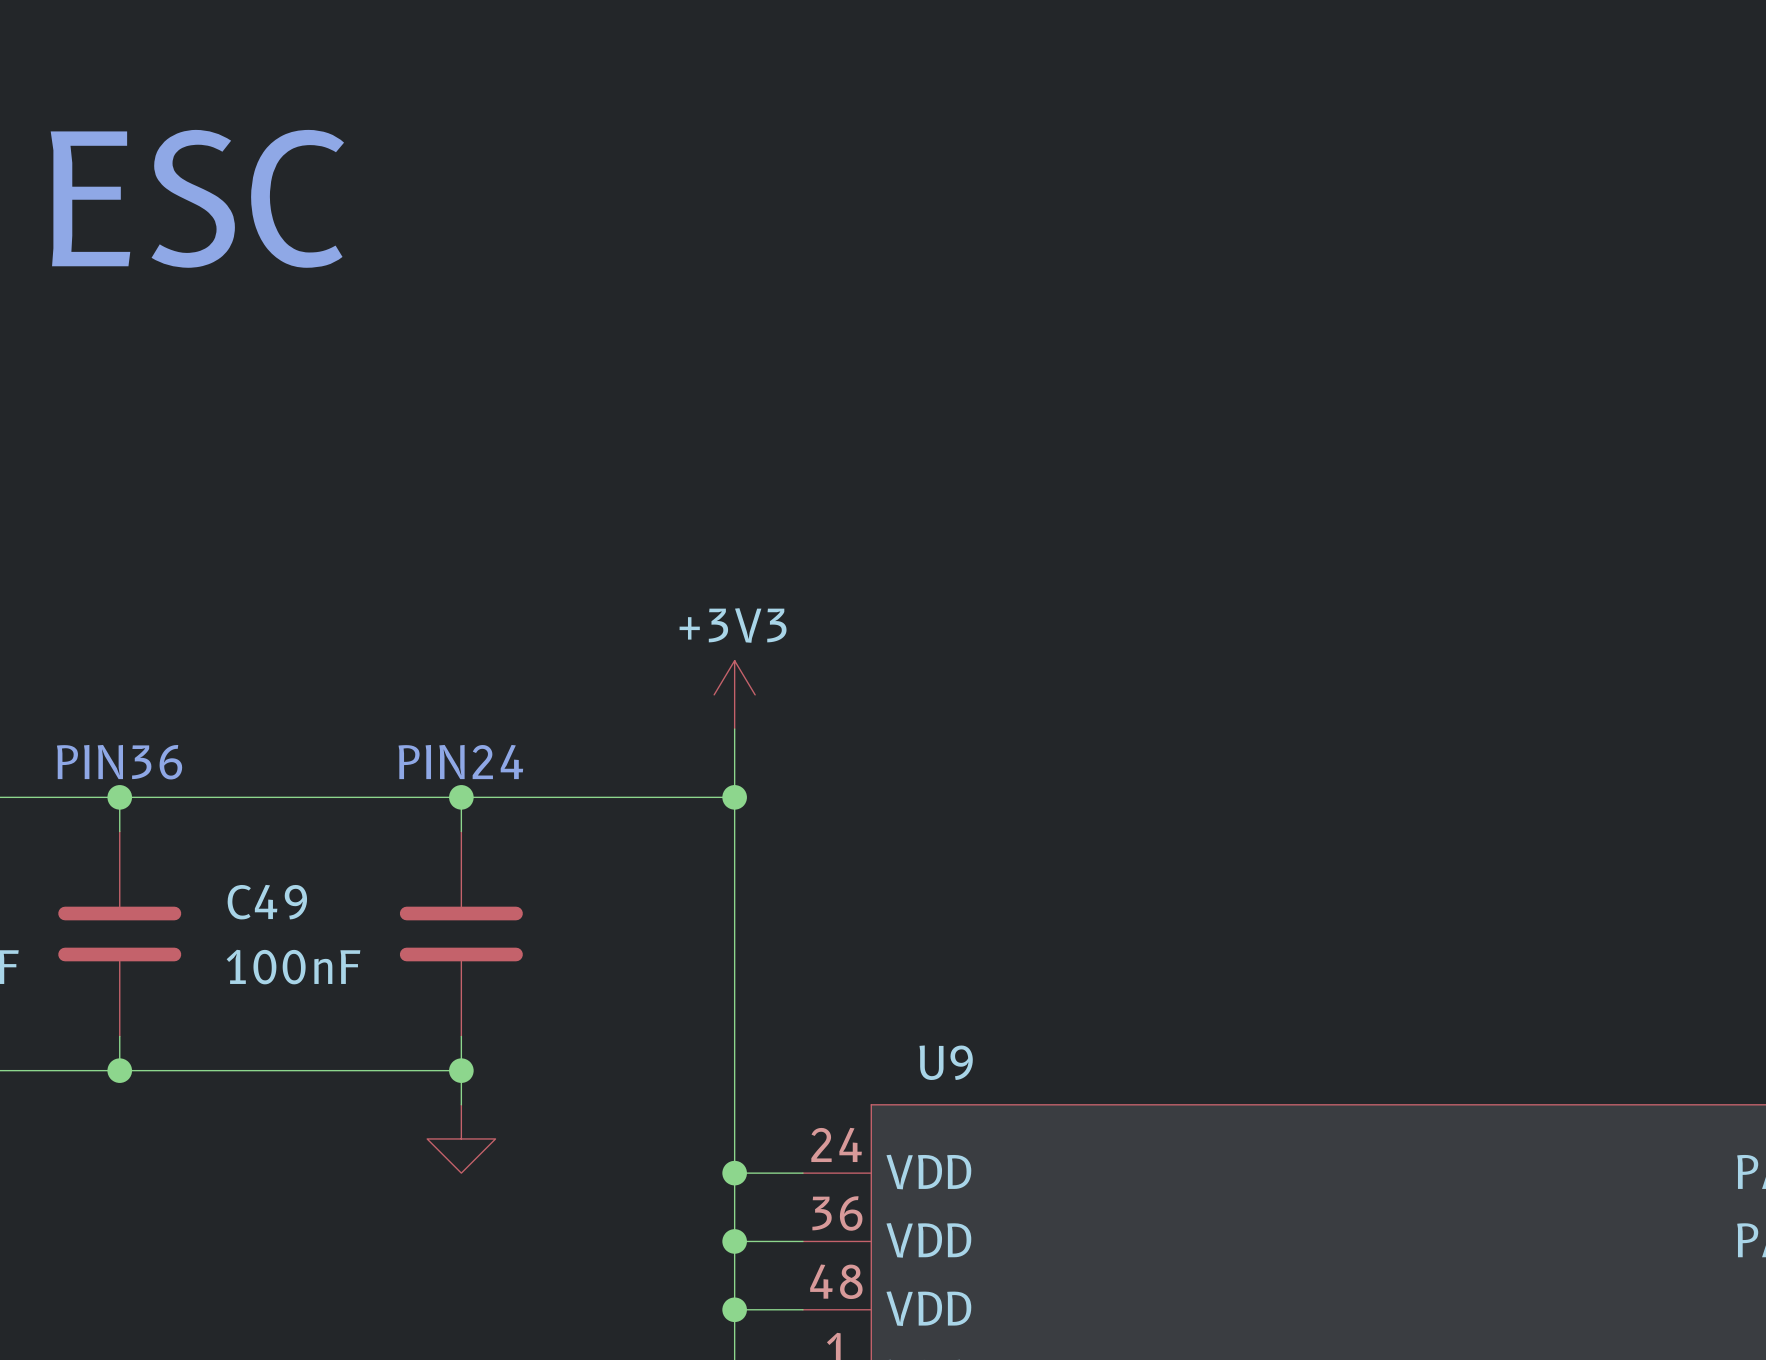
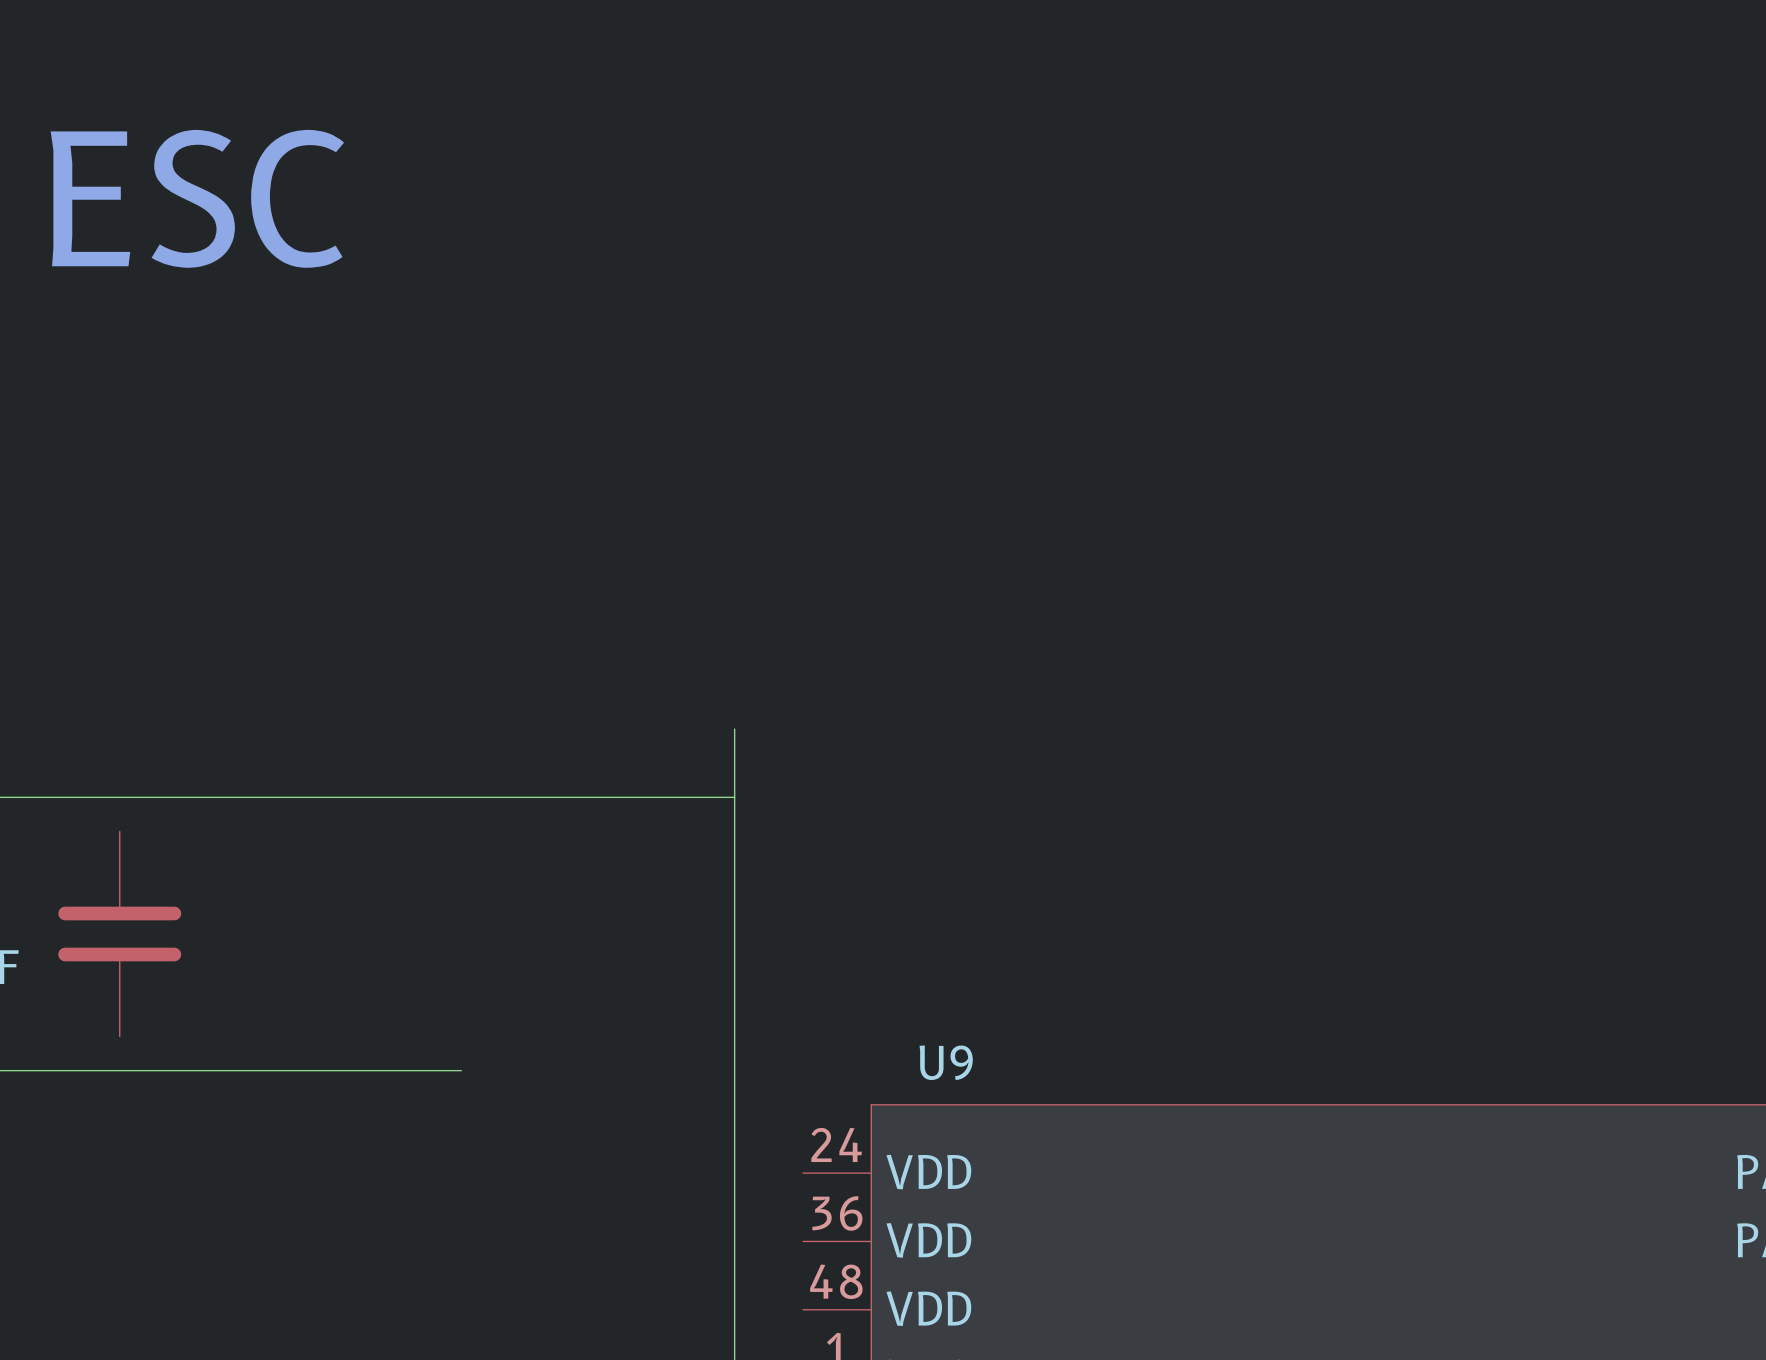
power symbol: +3V3 (734, 694) -> none
text: PIN36 (119, 762) -> none
text: PIN24 (460, 762) -> none
wire: (119, 797) (119, 831) -> none
junction: (119, 797) -> none
wire: (461, 797) (461, 831) -> none
junction: (461, 797) -> none
junction: (734, 797) -> none
C49: 100nF (461, 934) -> none
wire: (119, 1036) (119, 1070) -> none
wire: (461, 1036) (461, 1104) -> none
junction: (119, 1070) -> none
junction: (461, 1070) -> none
power symbol: (461, 1138) -> none
wire: (734, 1173) (802, 1173) -> none
junction: (734, 1173) -> none
wire: (734, 1241) (802, 1241) -> none
junction: (734, 1241) -> none
wire: (734, 1309) (802, 1309) -> none
junction: (734, 1309) -> none

